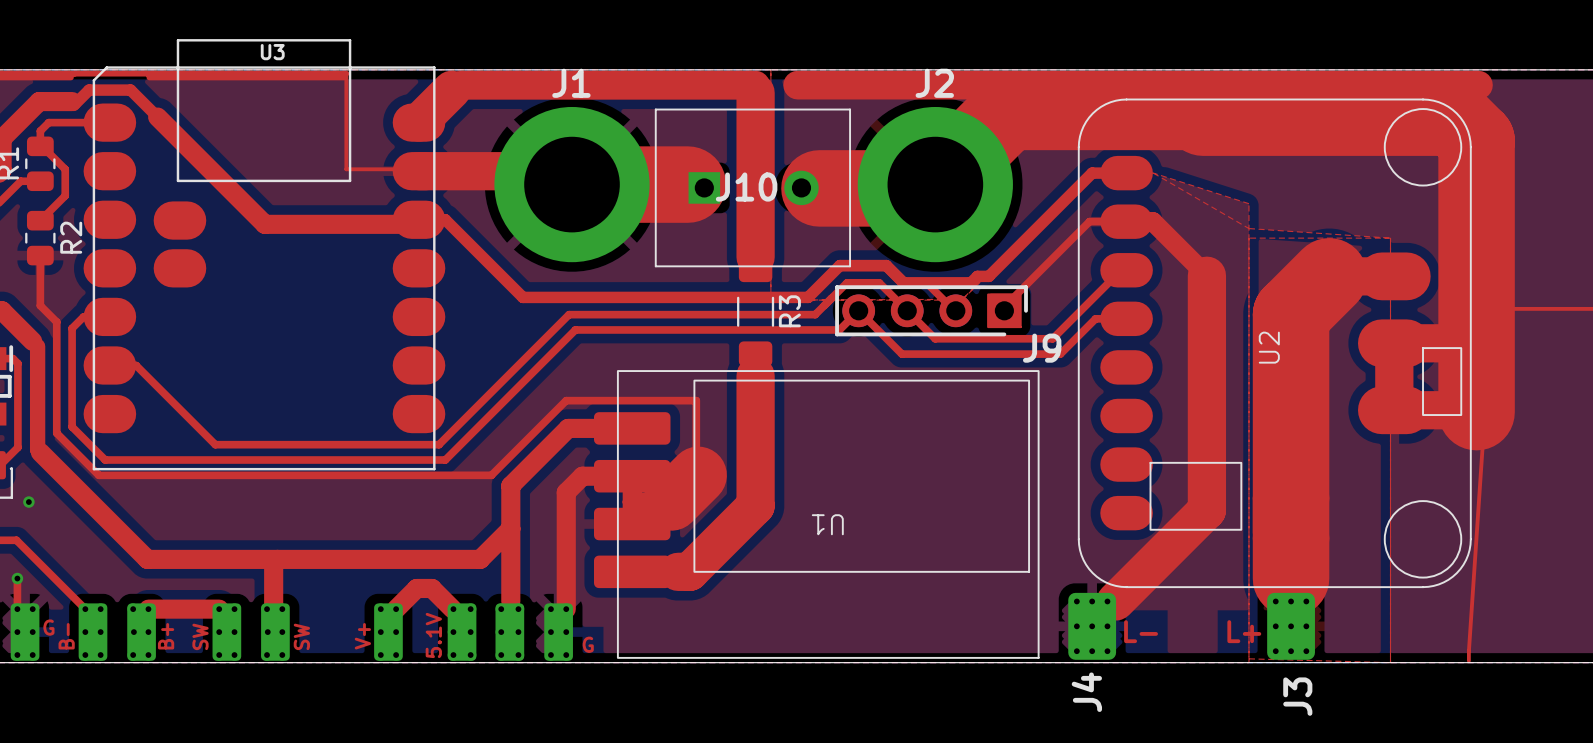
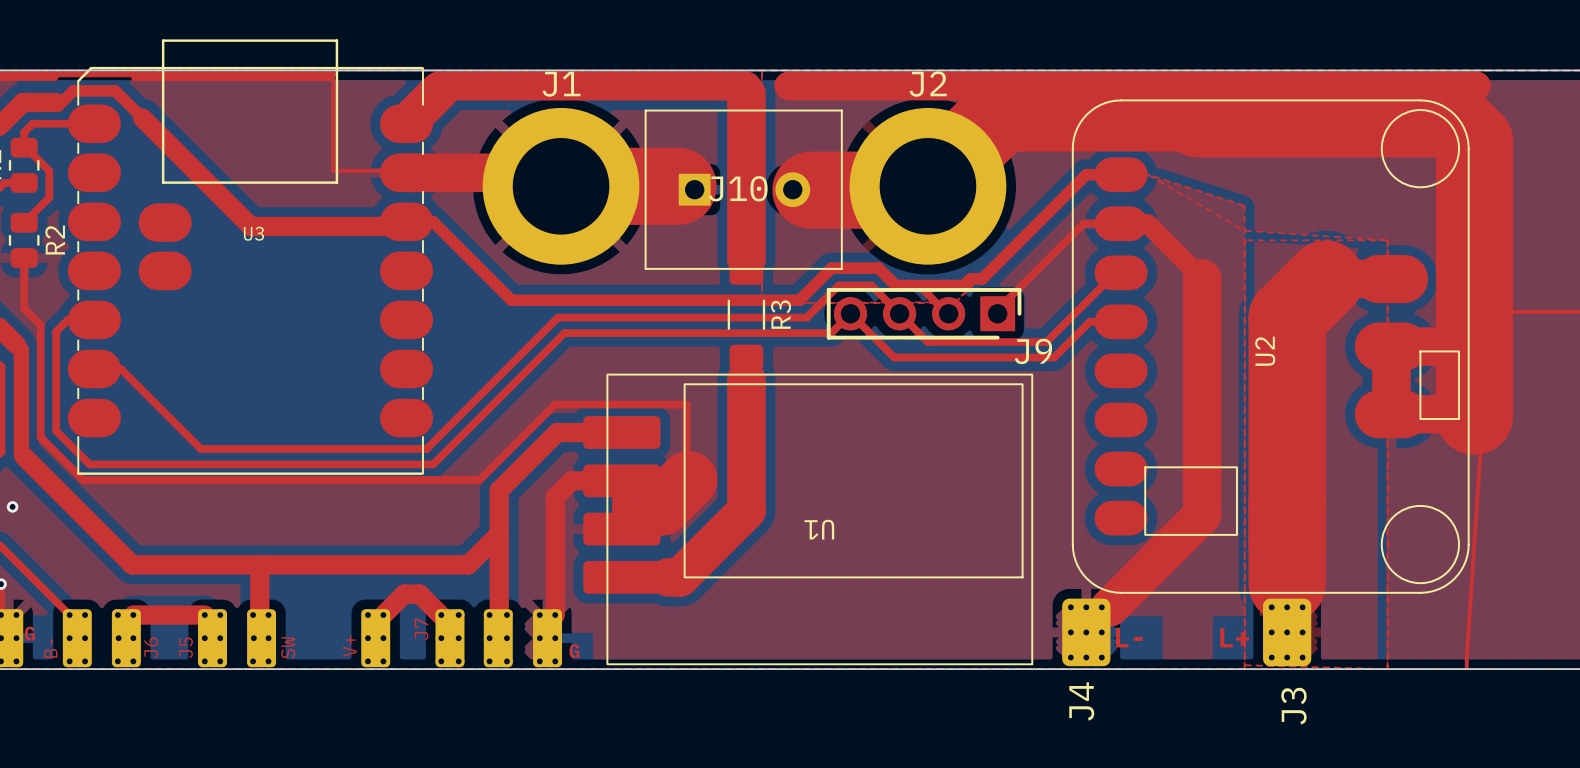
U3 footprint: [83, 39, 446, 471] -> [67, 39, 434, 475]
U3 name position: U3 (272, 52) -> U3 (253, 233)
5.1V name: 5.1V (433, 635) -> J7 (421, 629)
B+ name: B+ (166, 636) -> J6 (151, 647)
SW name: SW (200, 636) -> J5 (186, 647)

